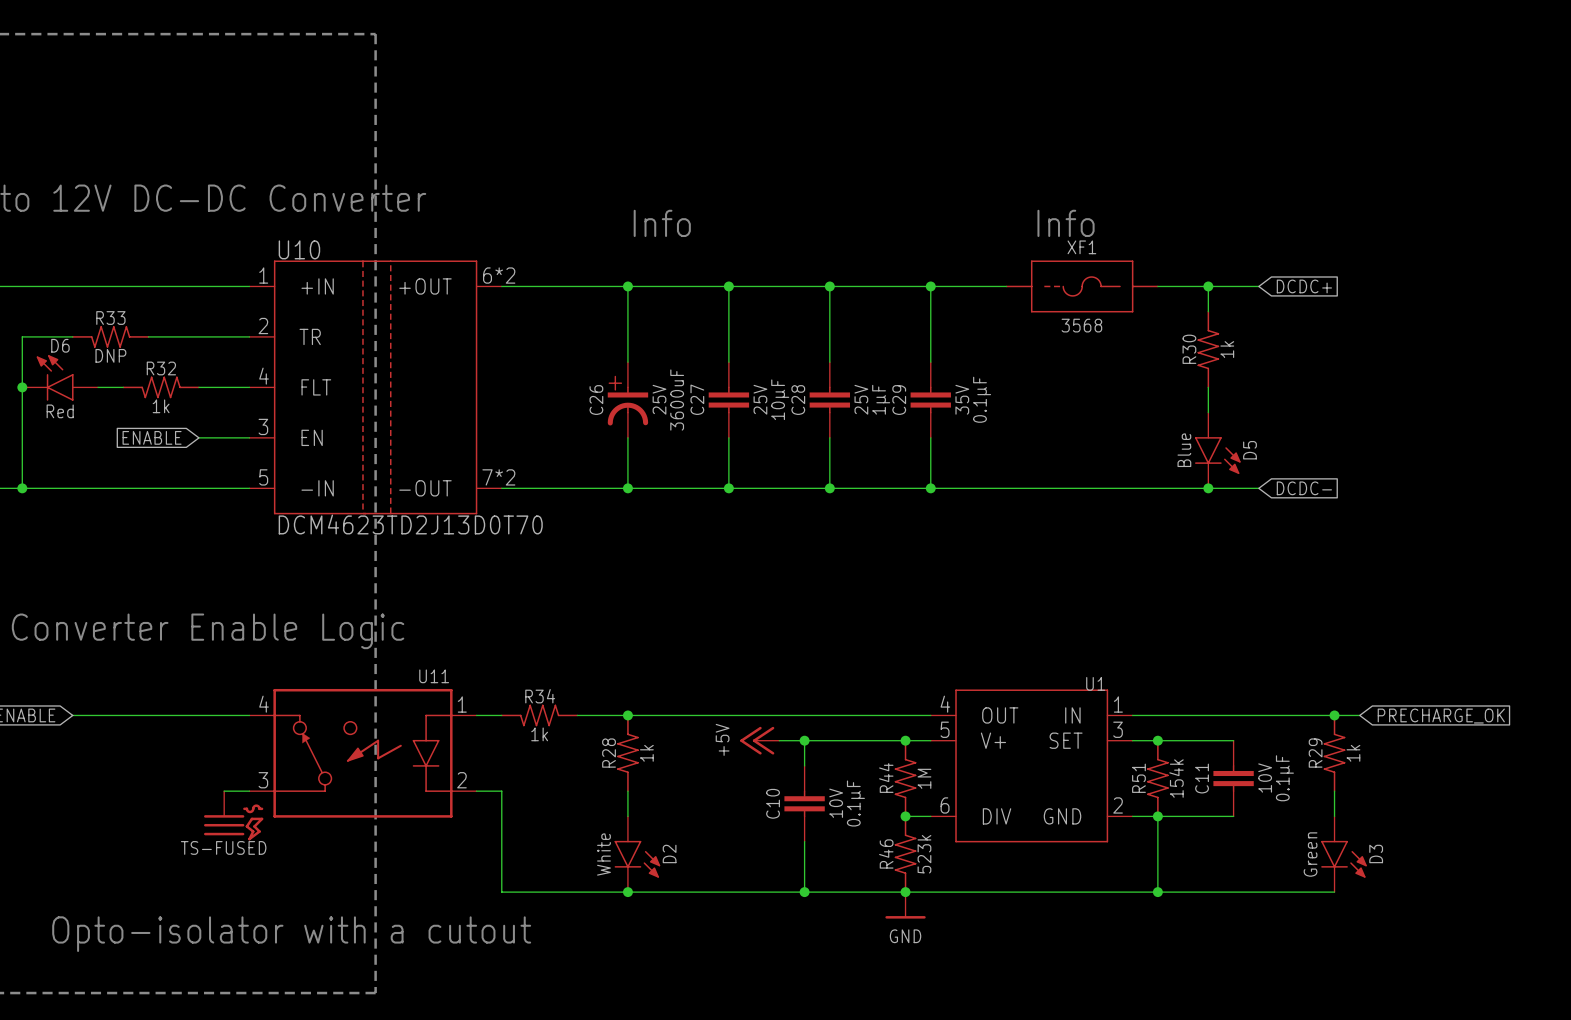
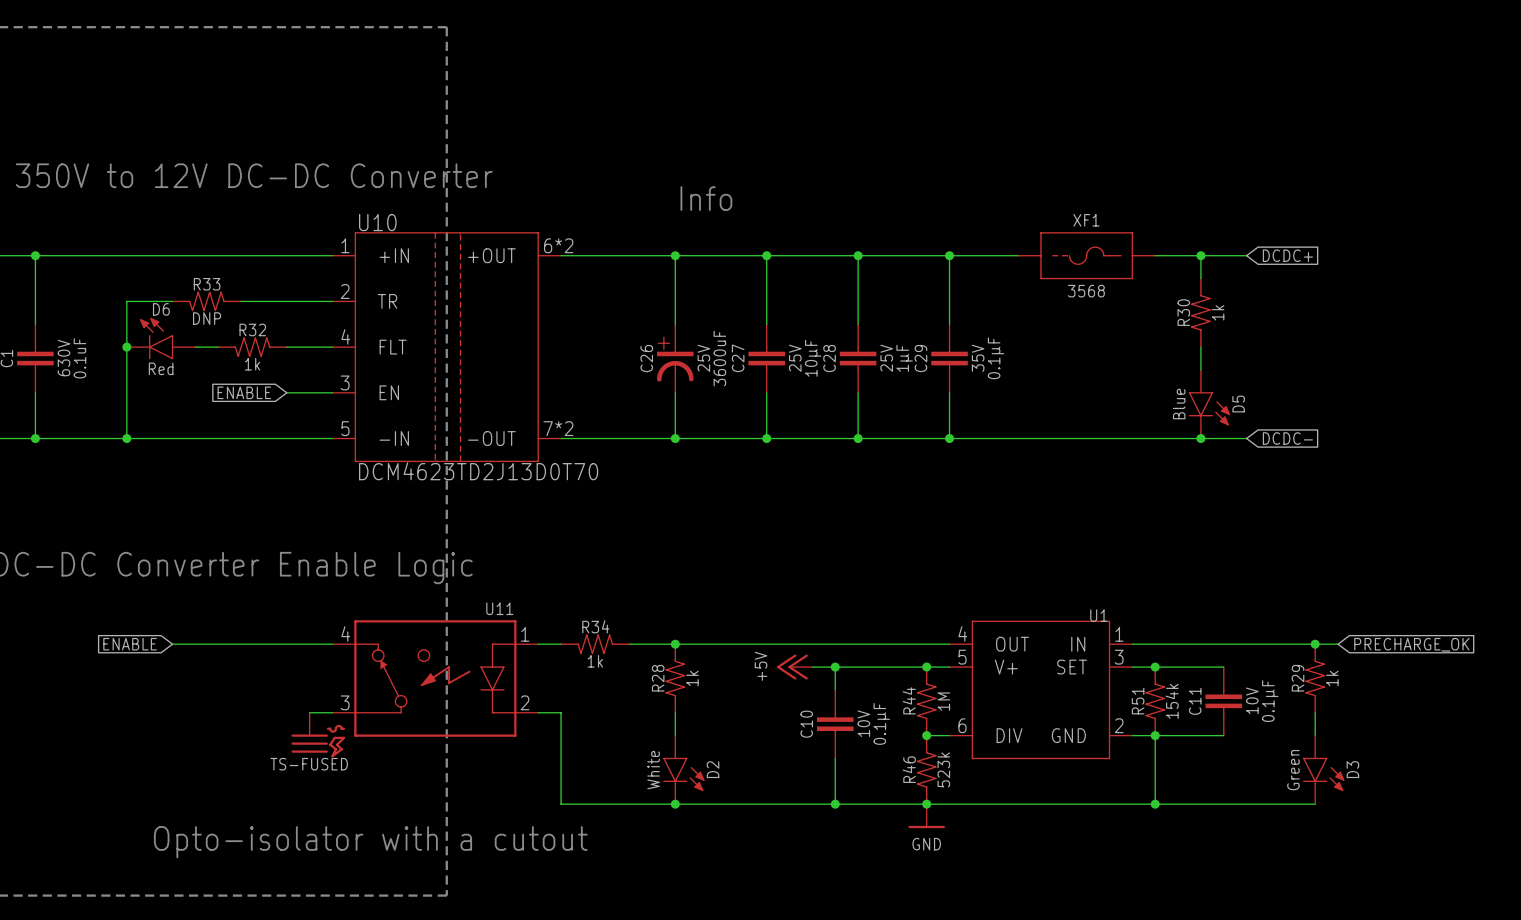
text: Info (1066, 223) -> none

